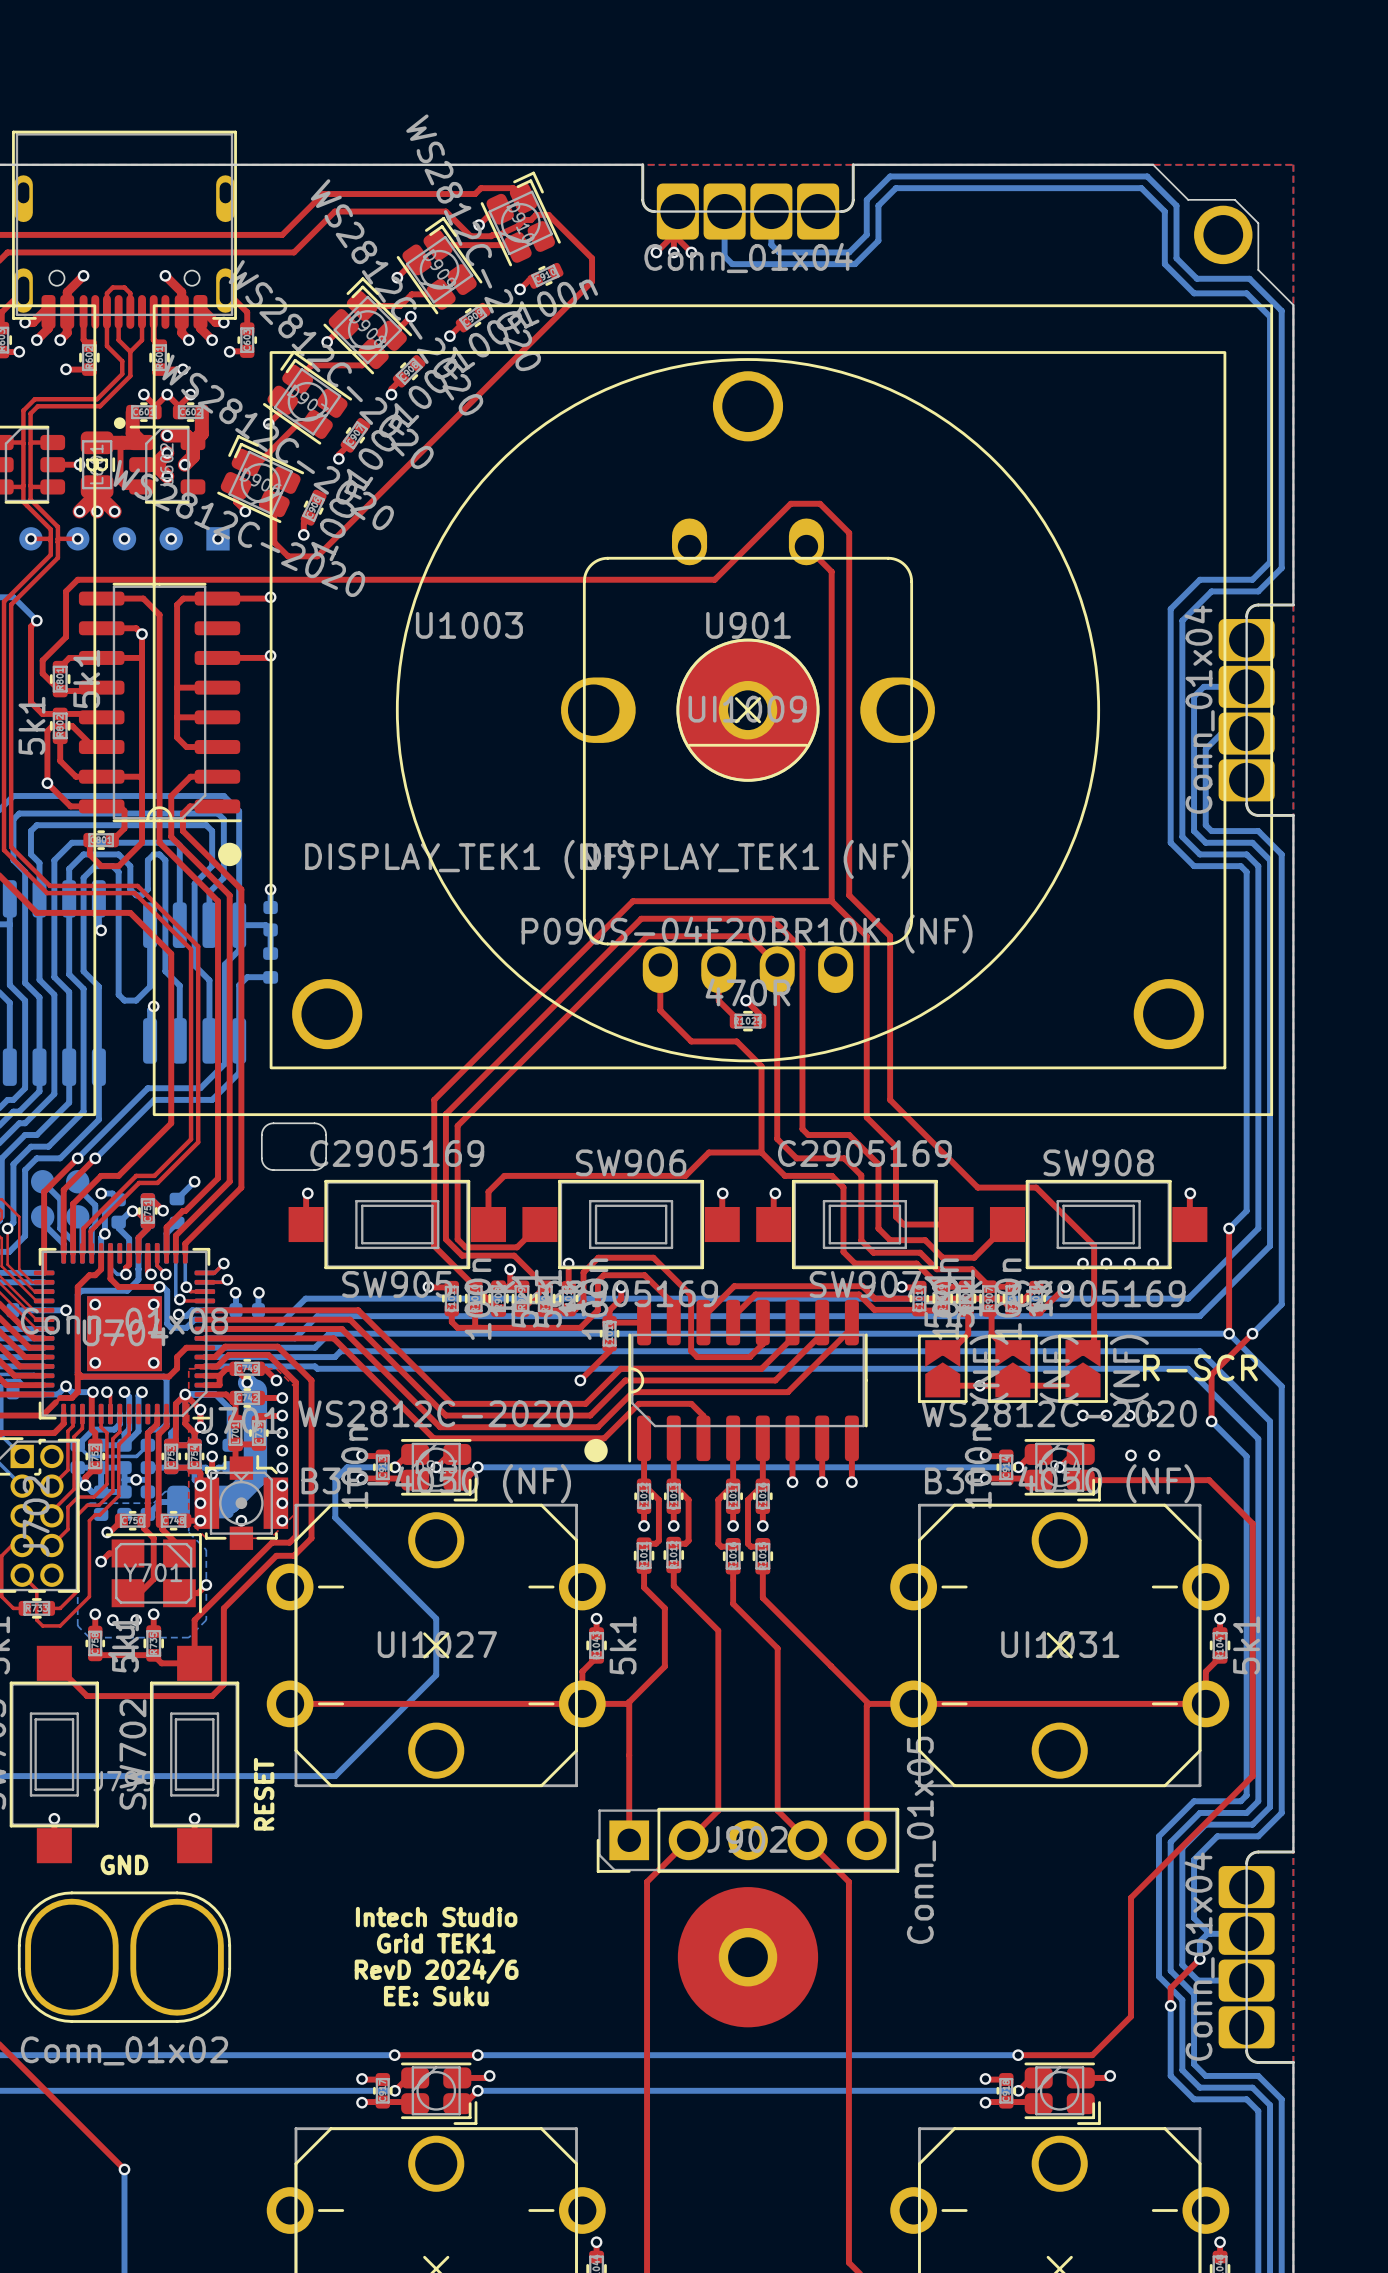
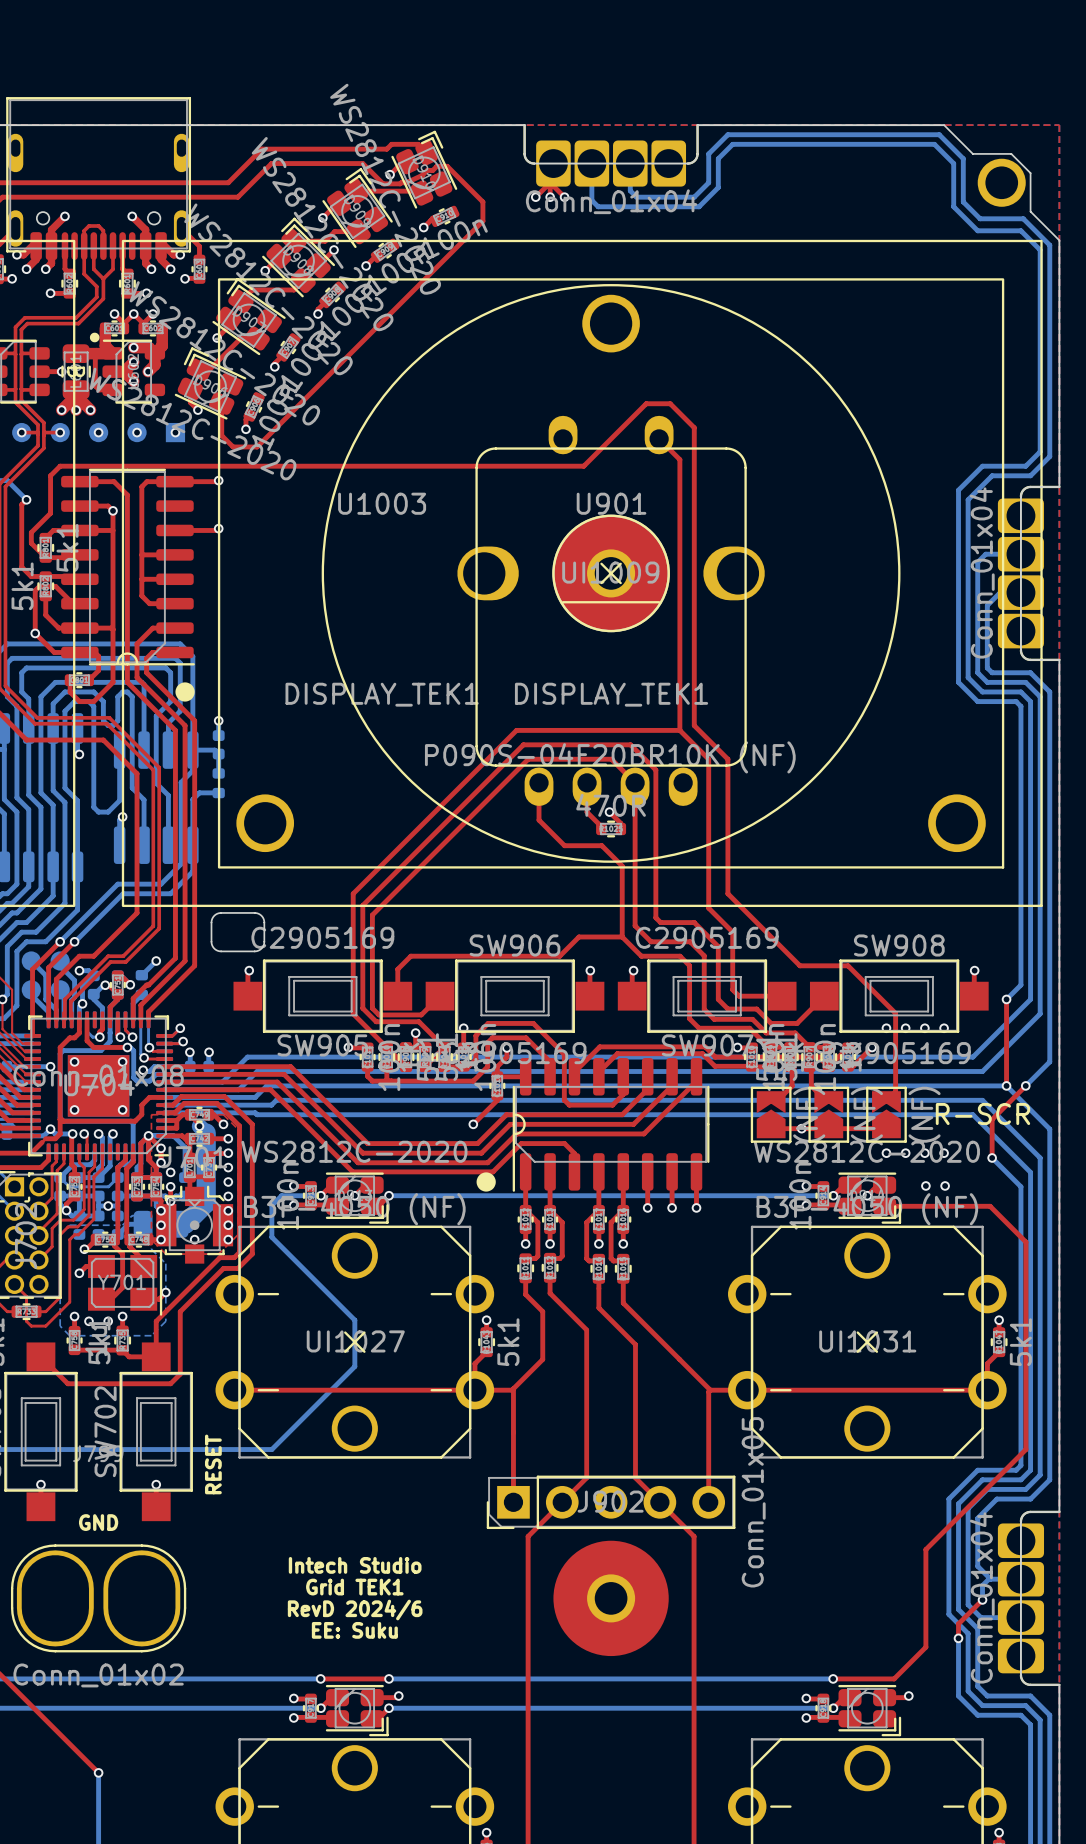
U1003 value: DISPLAY_TEK1 (NF) (468, 859) -> DISPLAY_TEK1 (382, 694)
U901 value: DISPLAY_TEK1 (NF) (747, 859) -> DISPLAY_TEK1 (611, 694)

